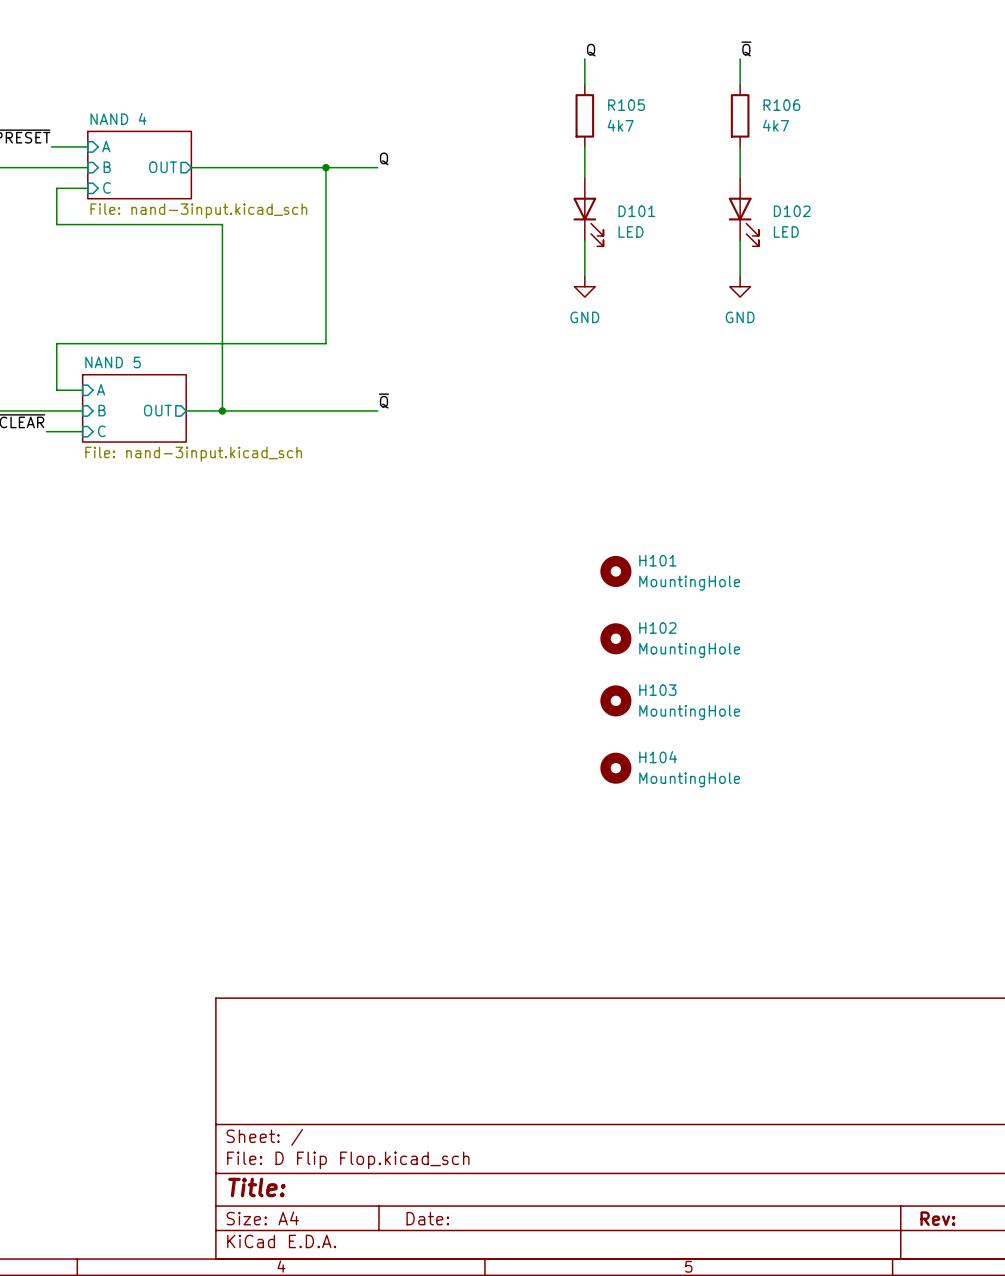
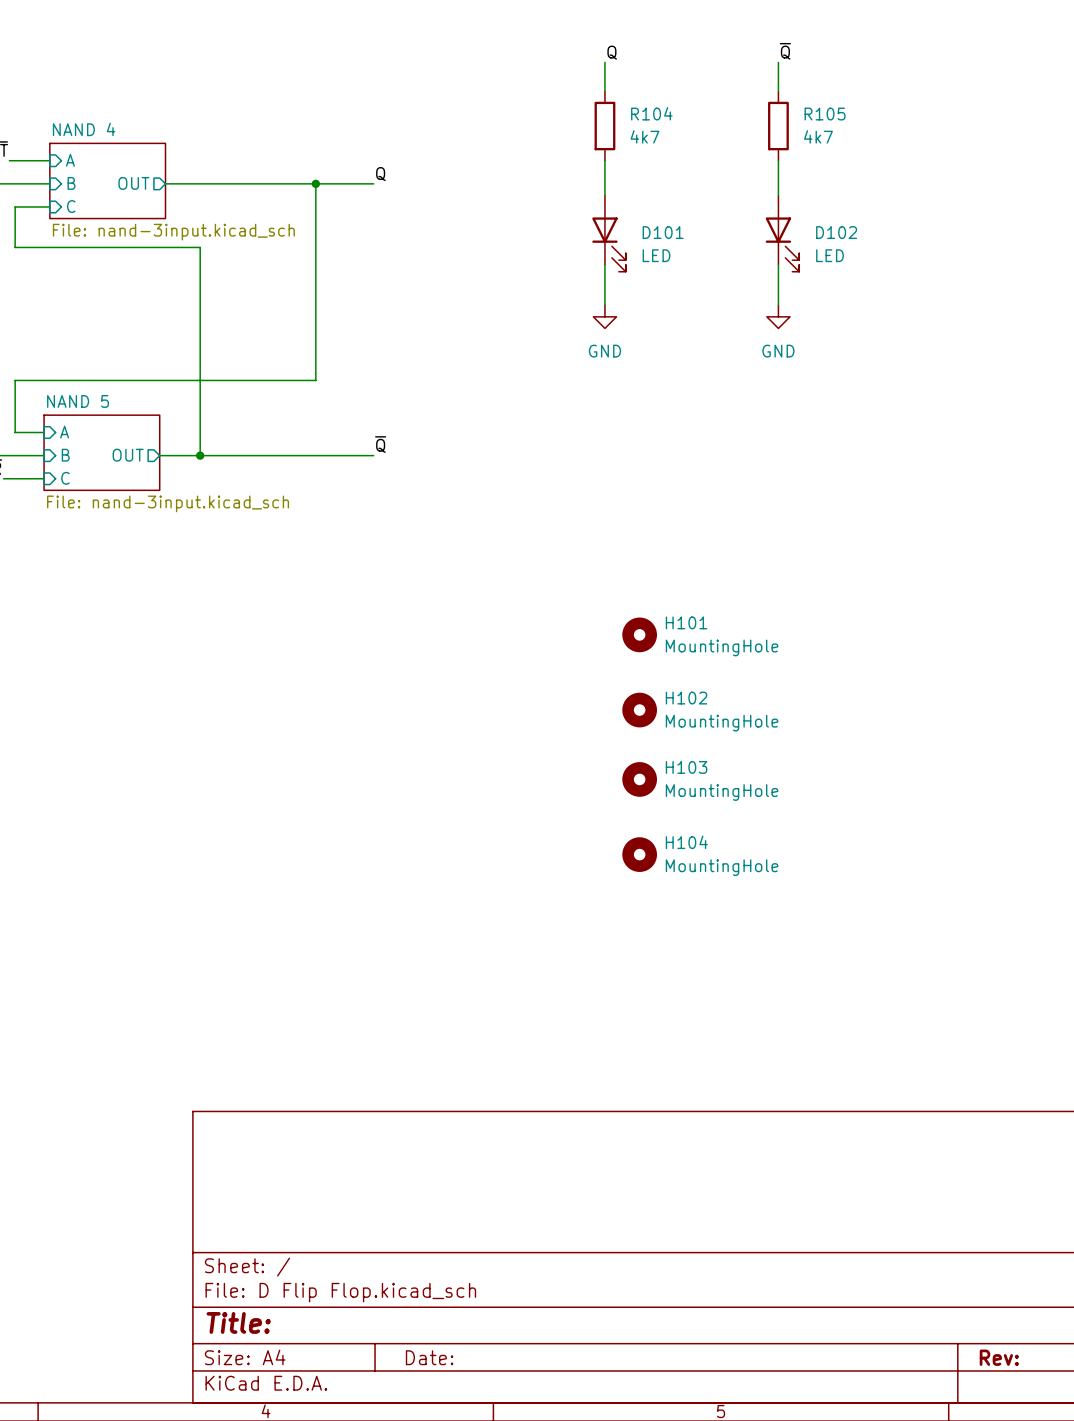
R105 name: R105 (626, 105) -> R104 (651, 113)
R106 name: R106 (781, 105) -> R105 (825, 114)

